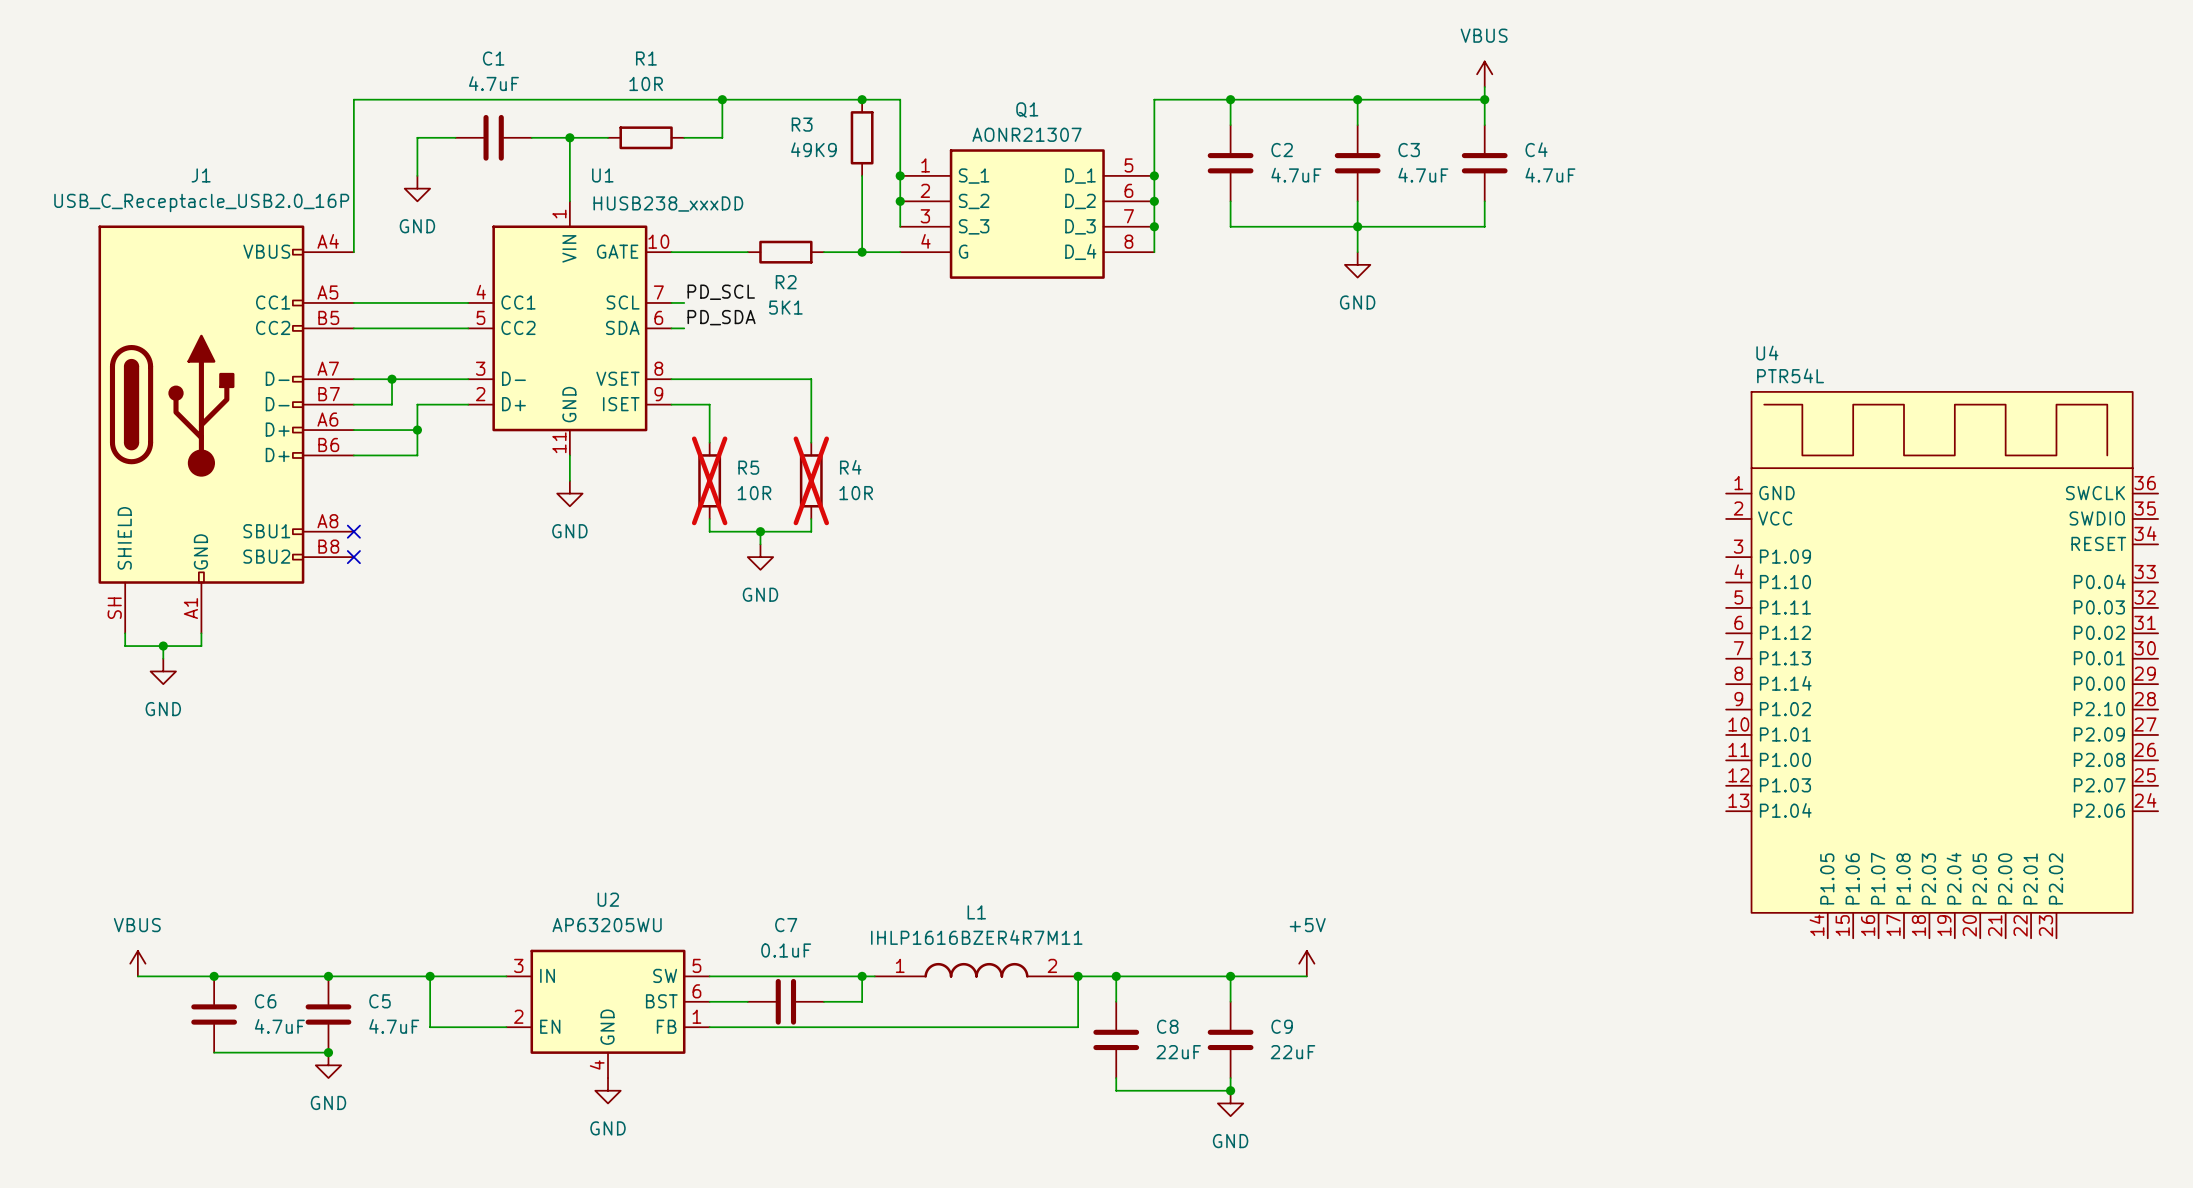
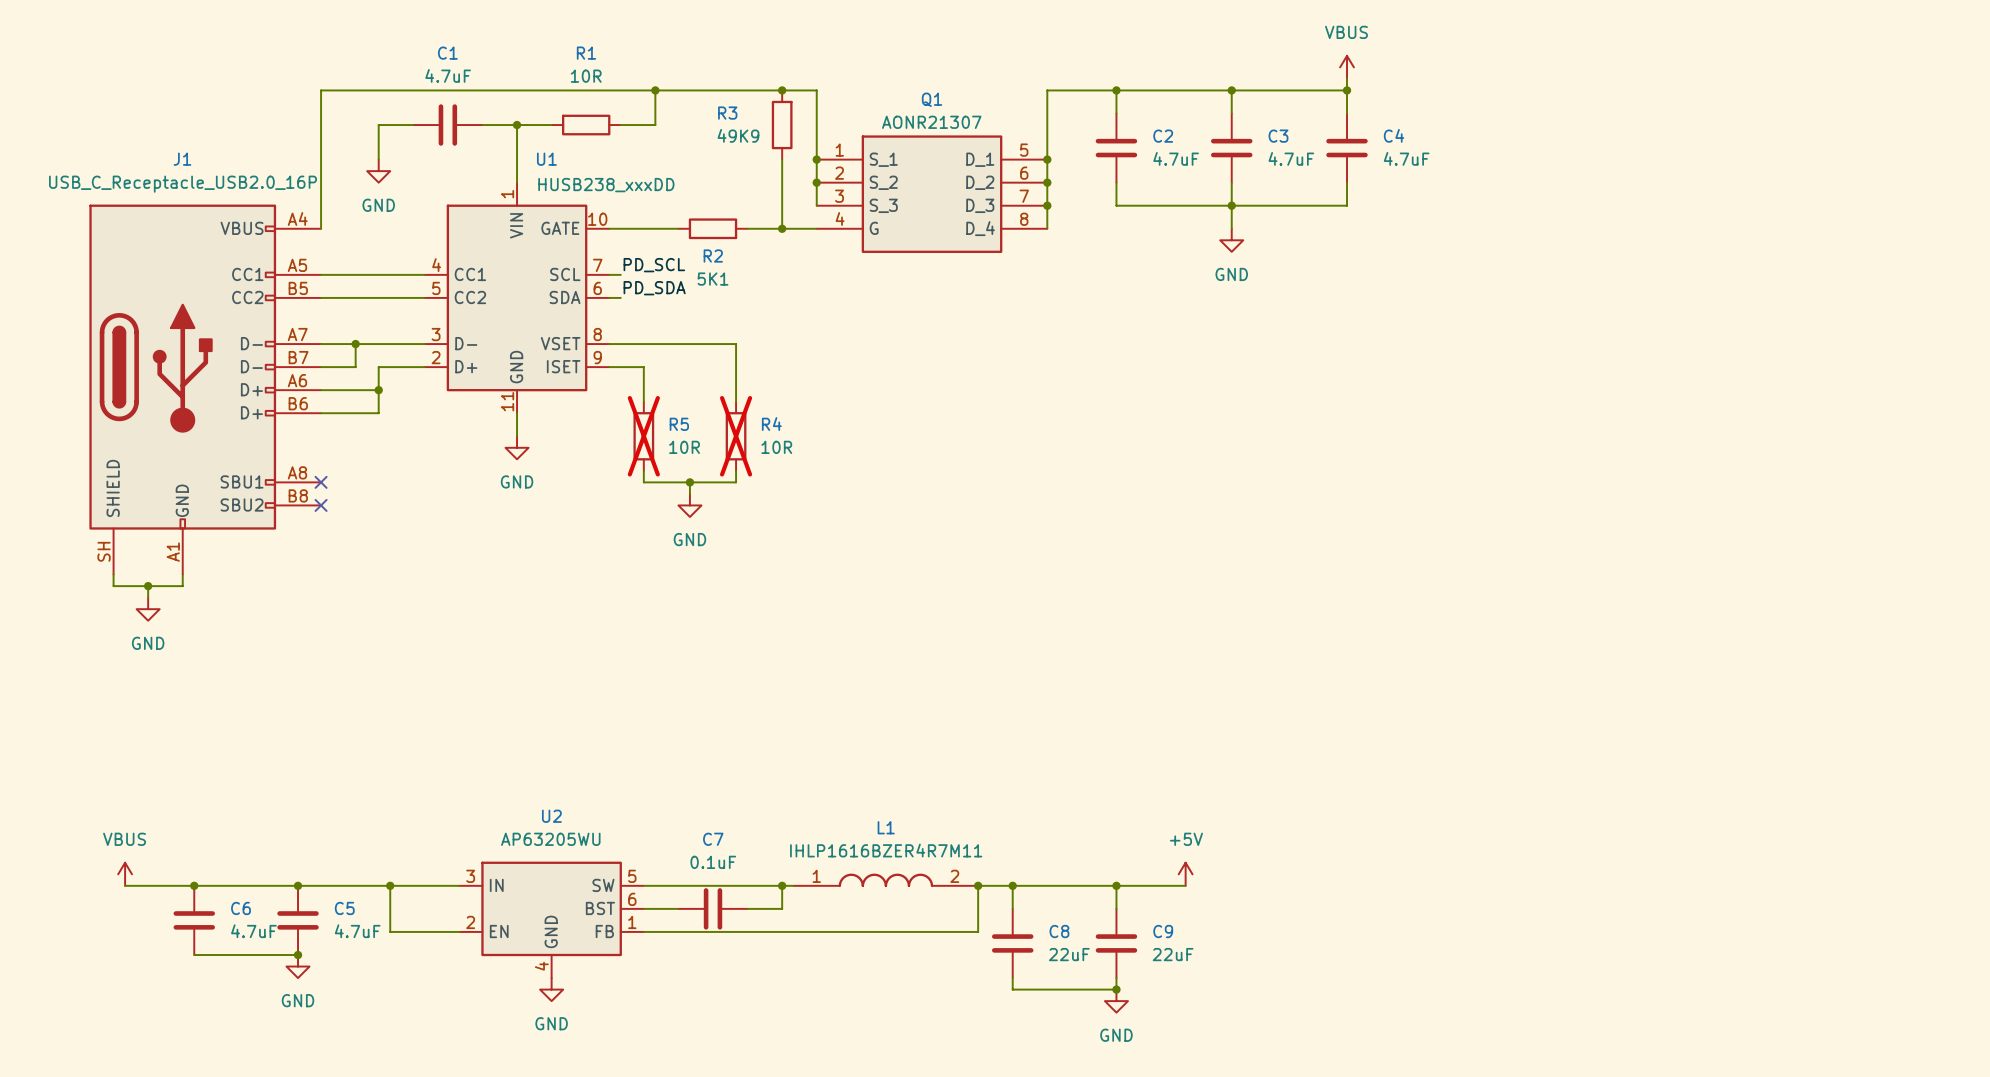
U4: PTR54L (1942, 665) -> none

